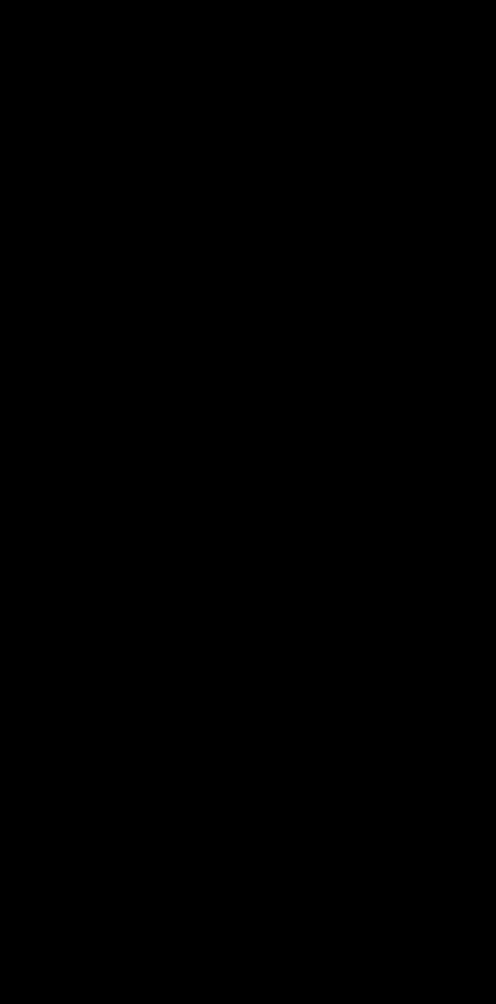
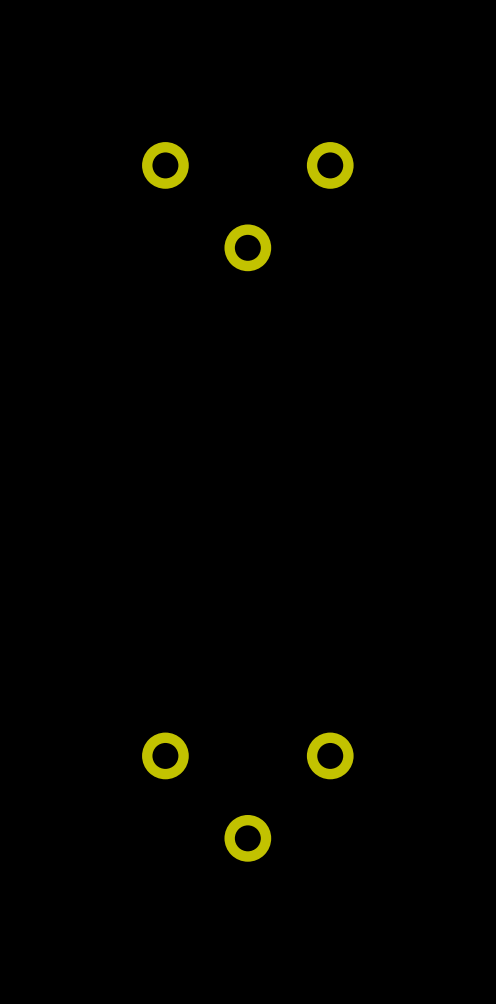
part: none -> (247, 206)
part: none -> (247, 797)

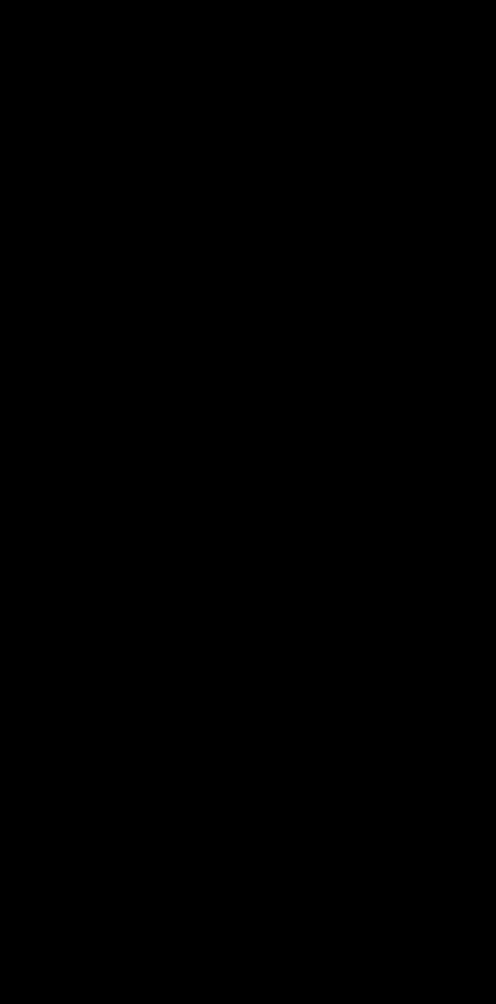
part: (247, 206) -> none
part: (247, 797) -> none

